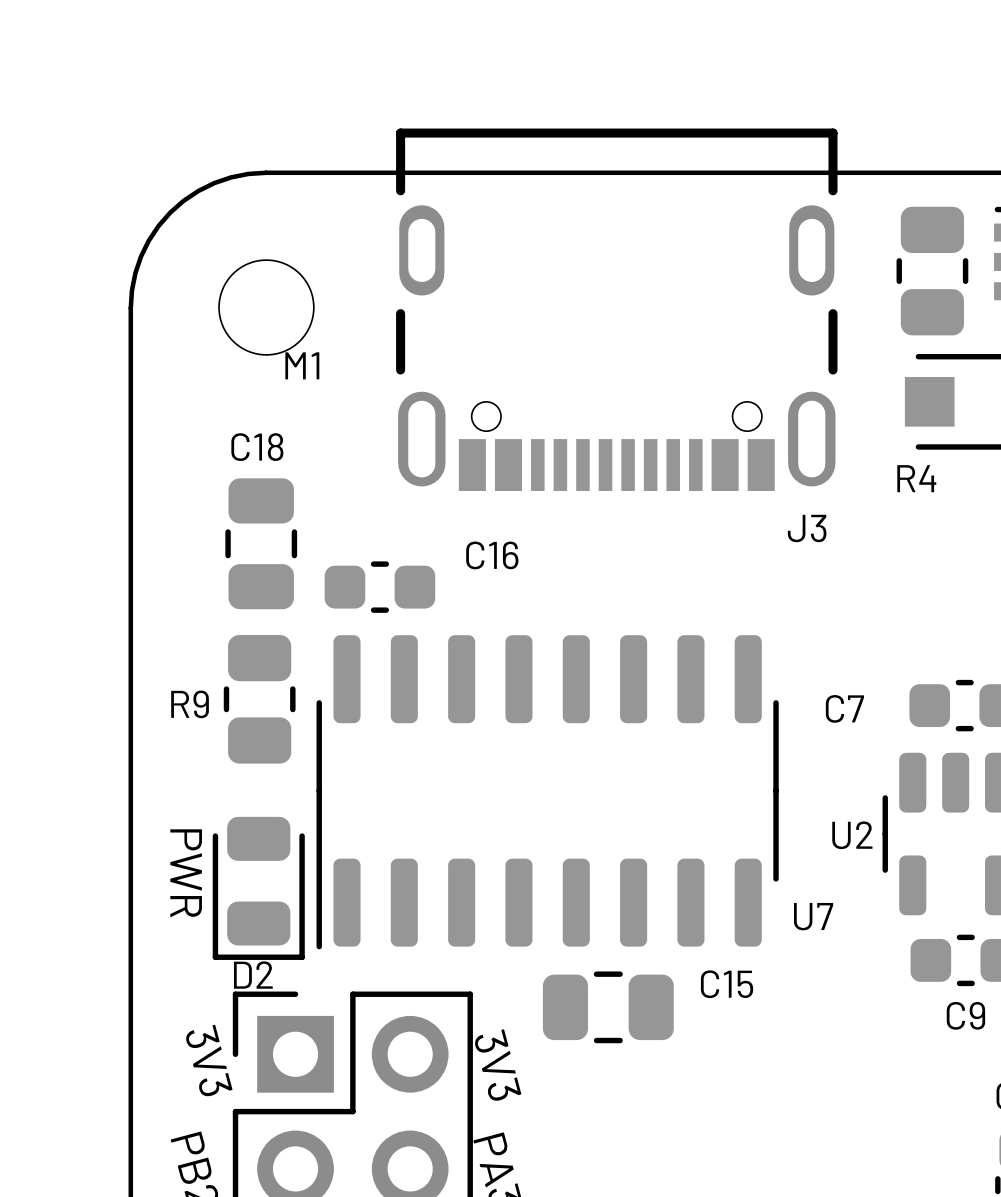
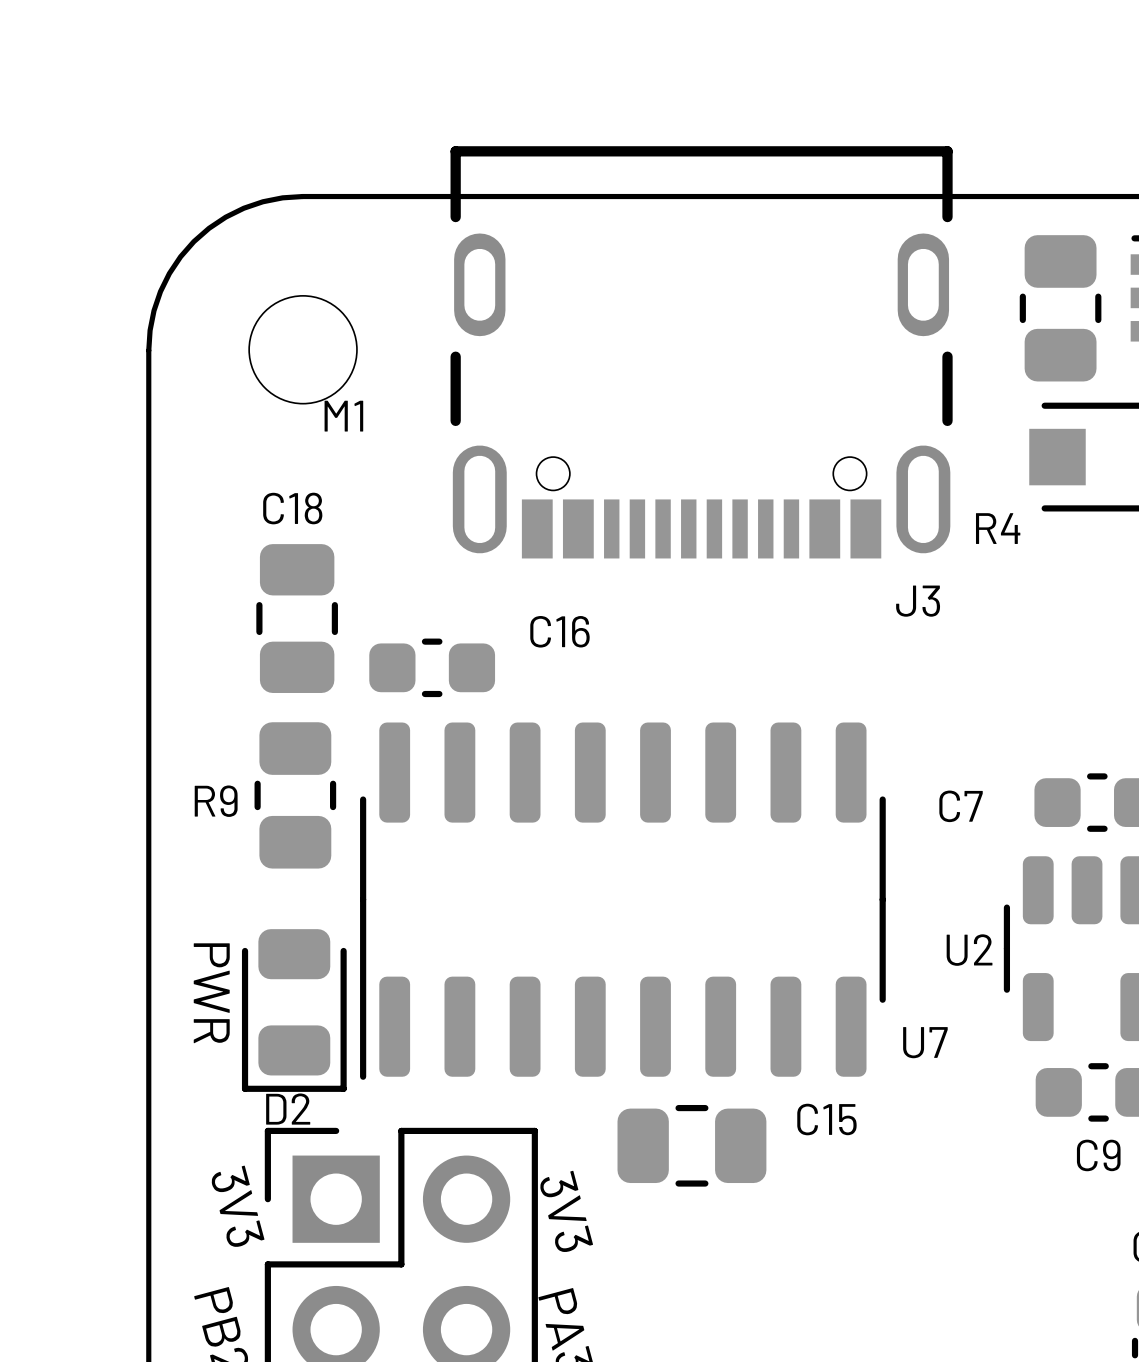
R4 name position: R4 (916, 478) -> R4 (998, 528)

